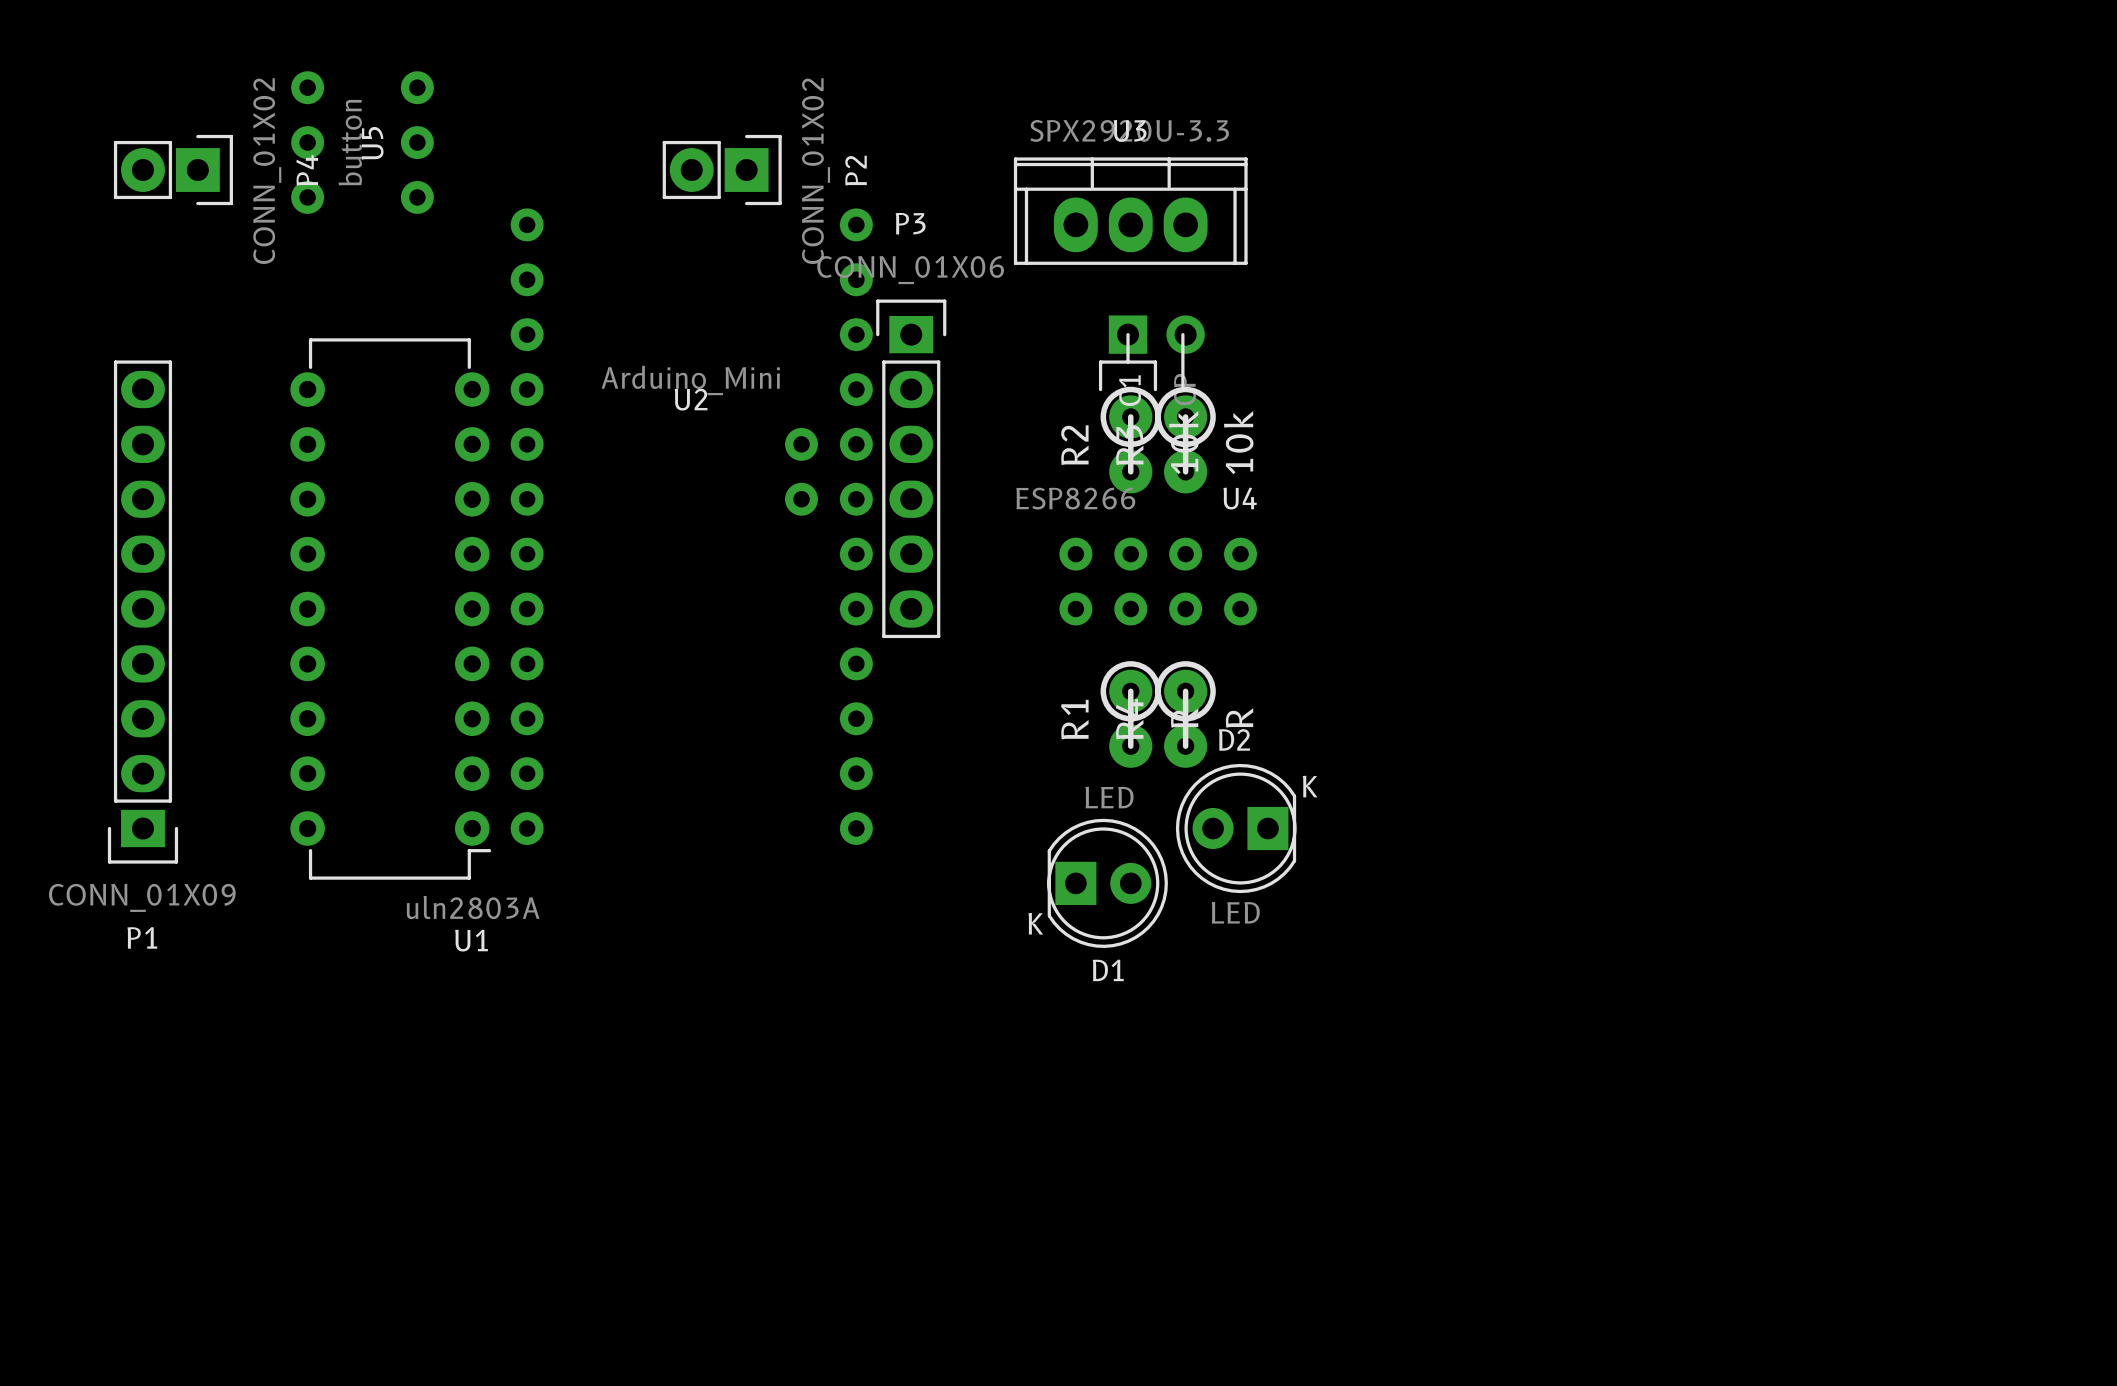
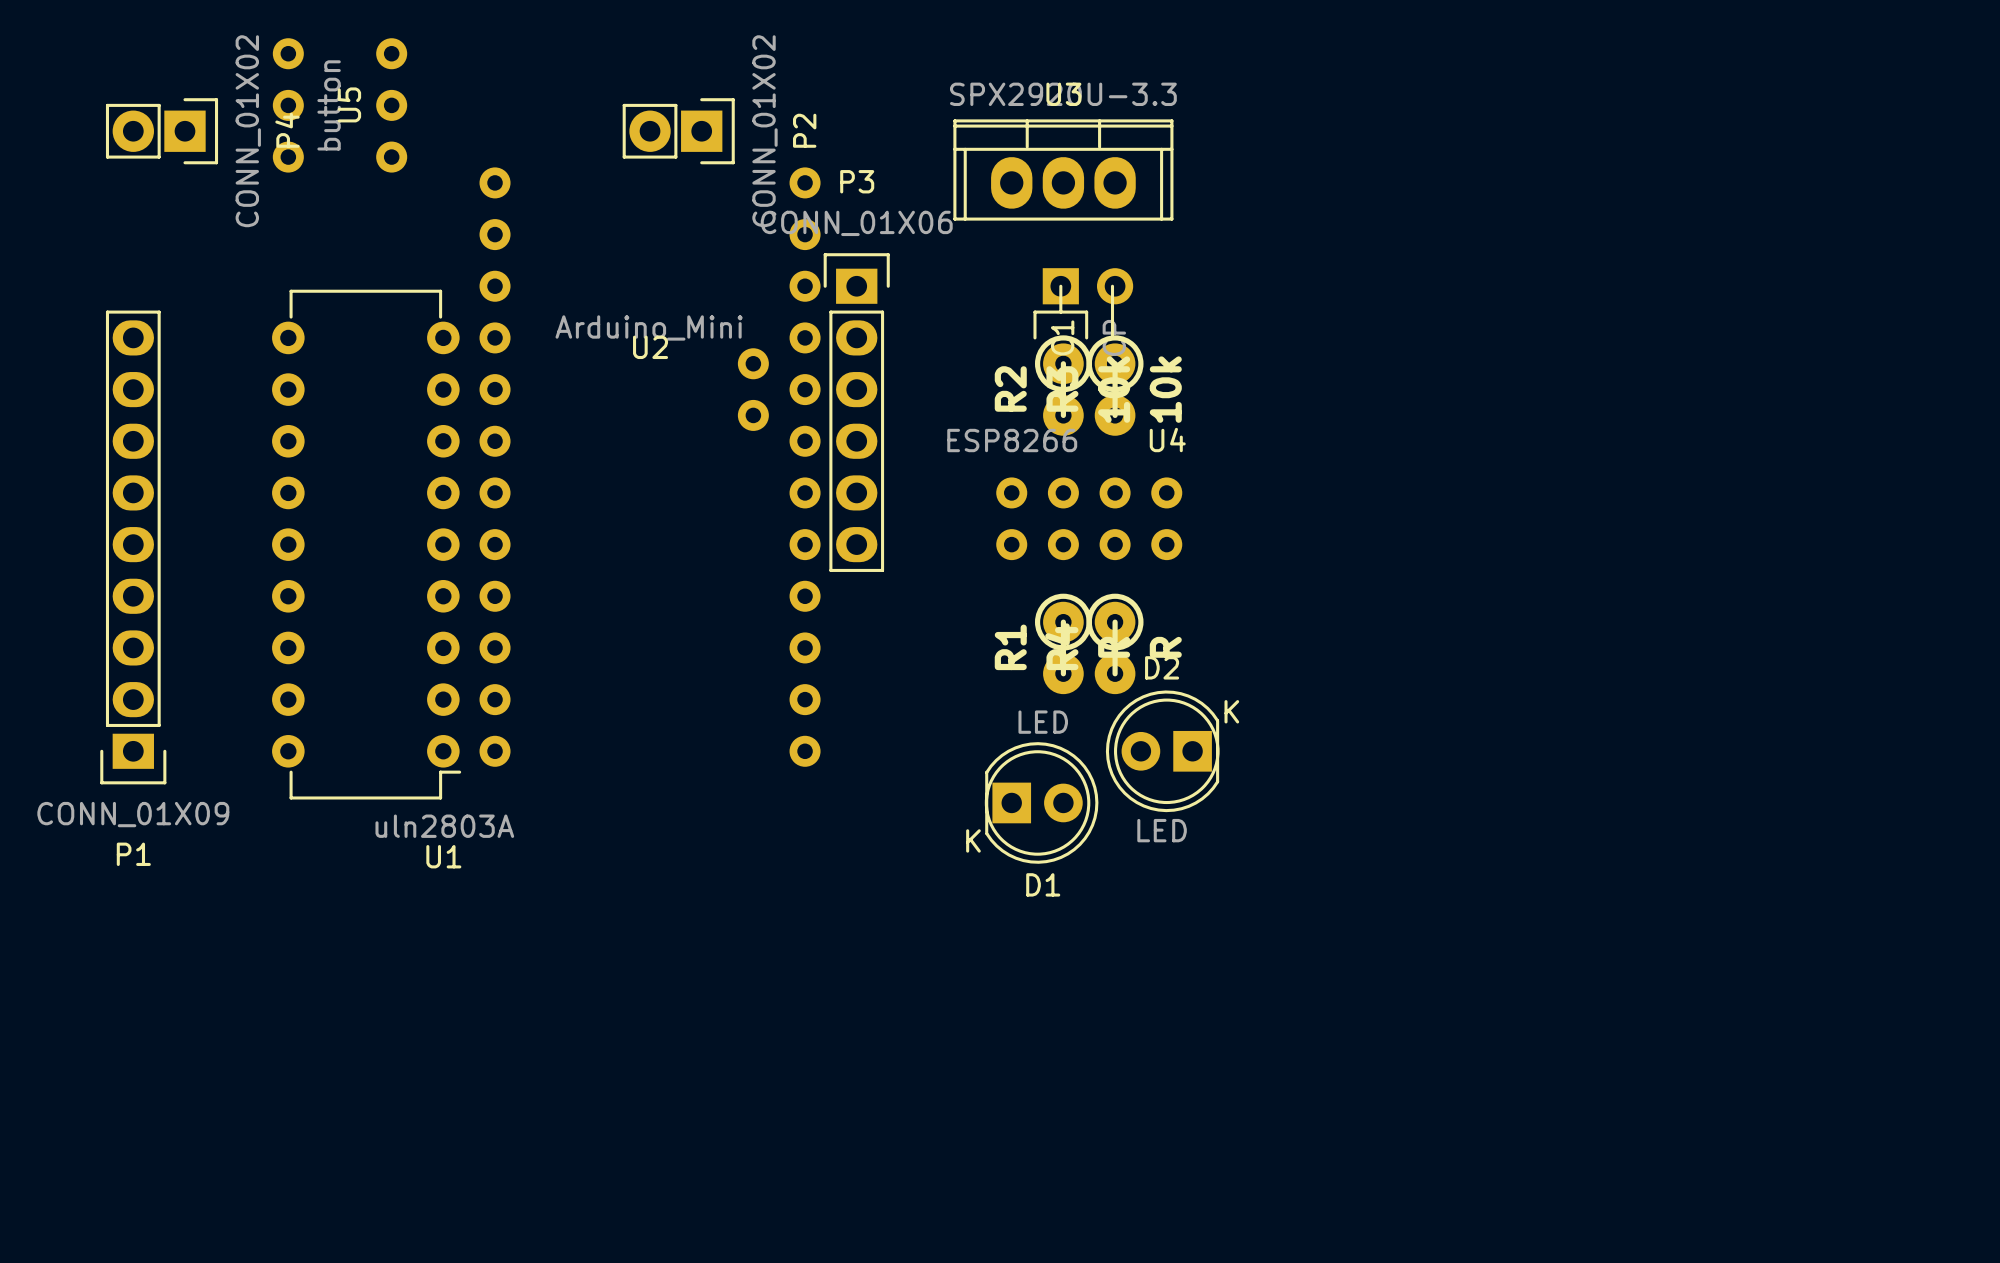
U2 footprint: [510, 208, 873, 845] -> [479, 167, 821, 767]

